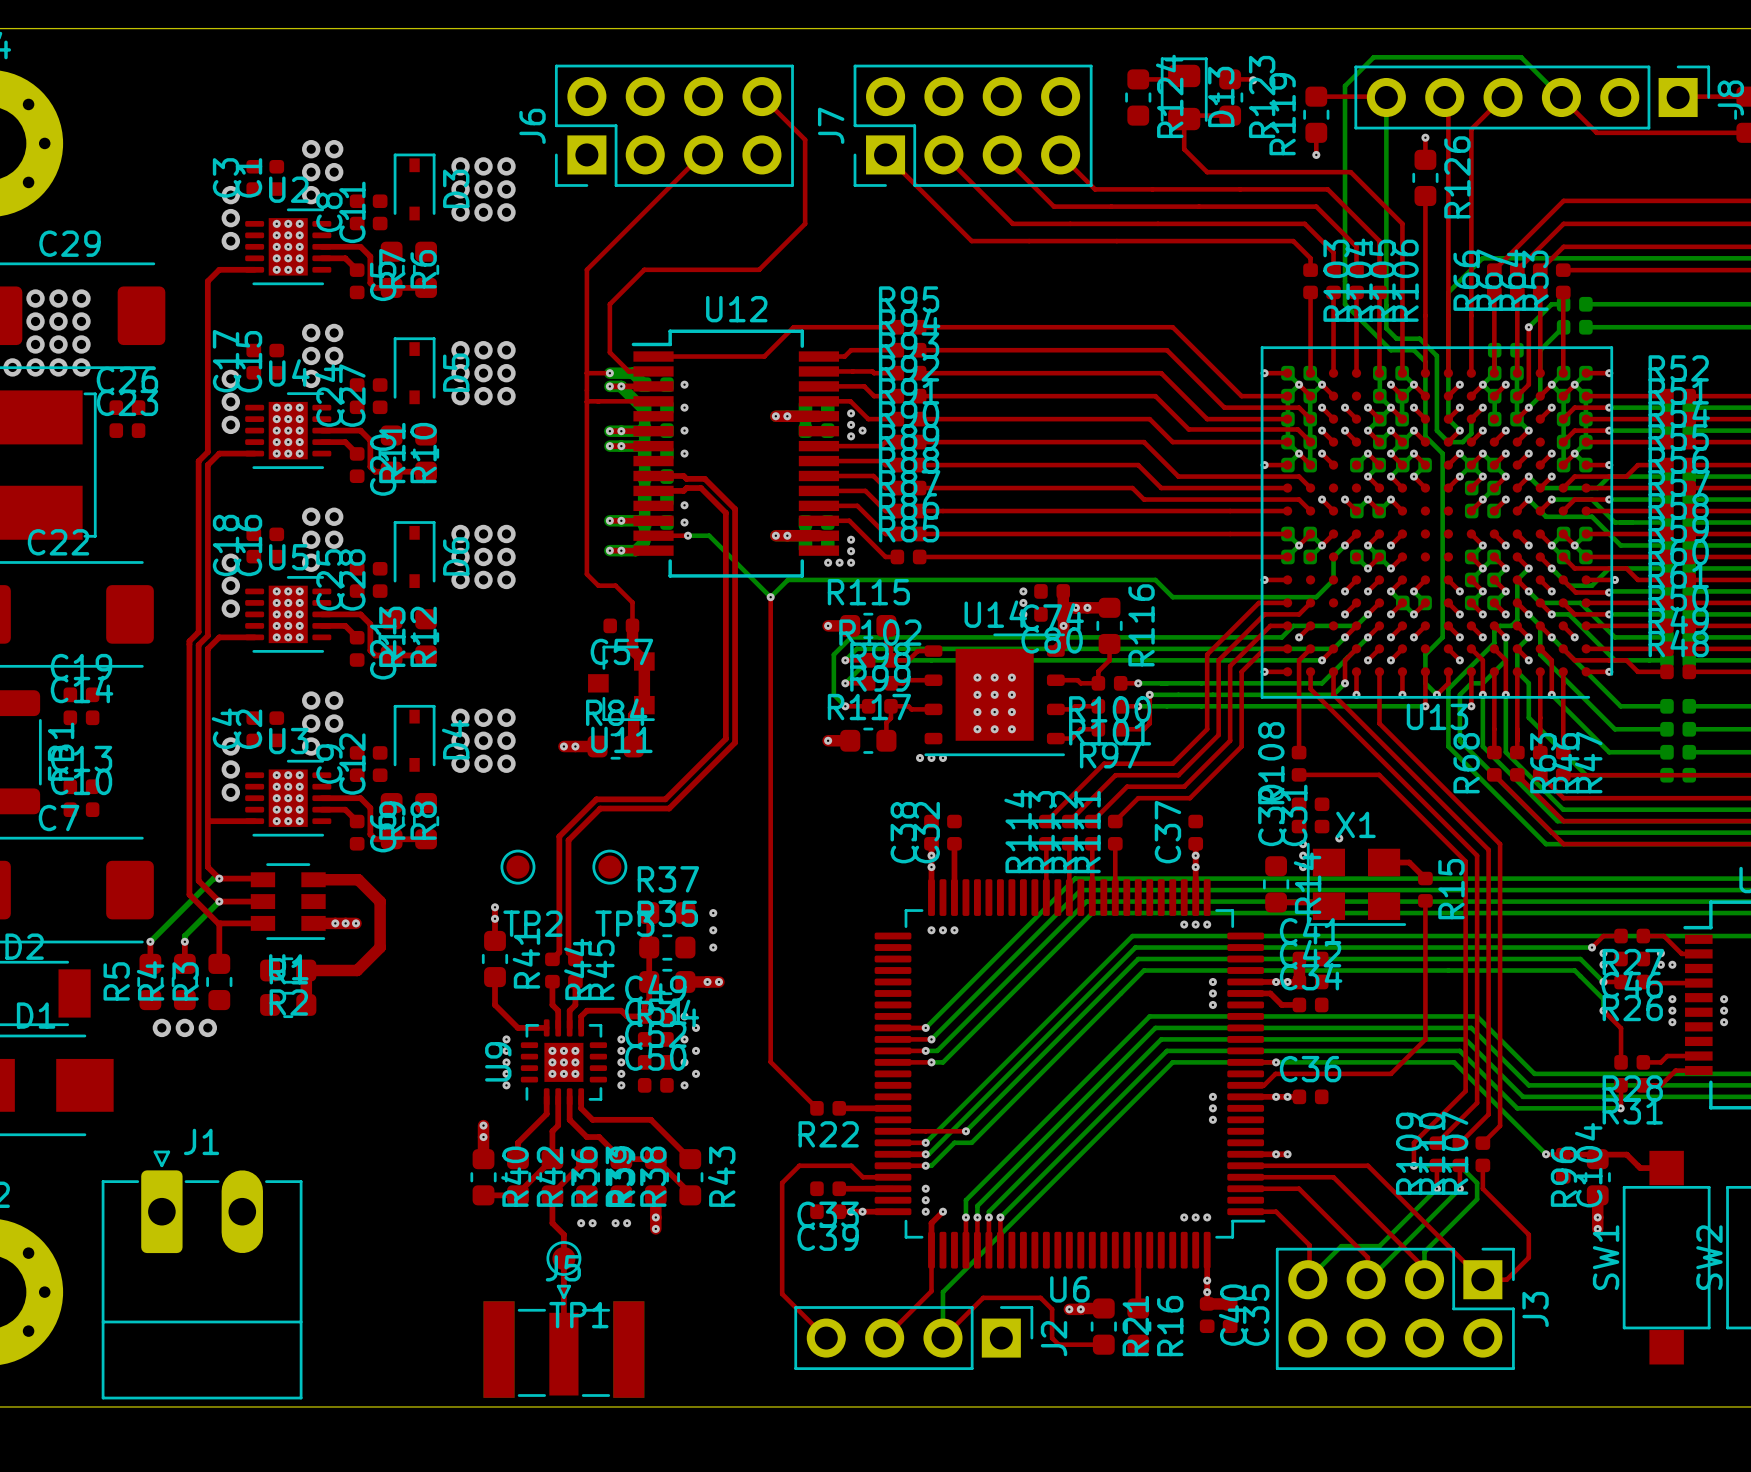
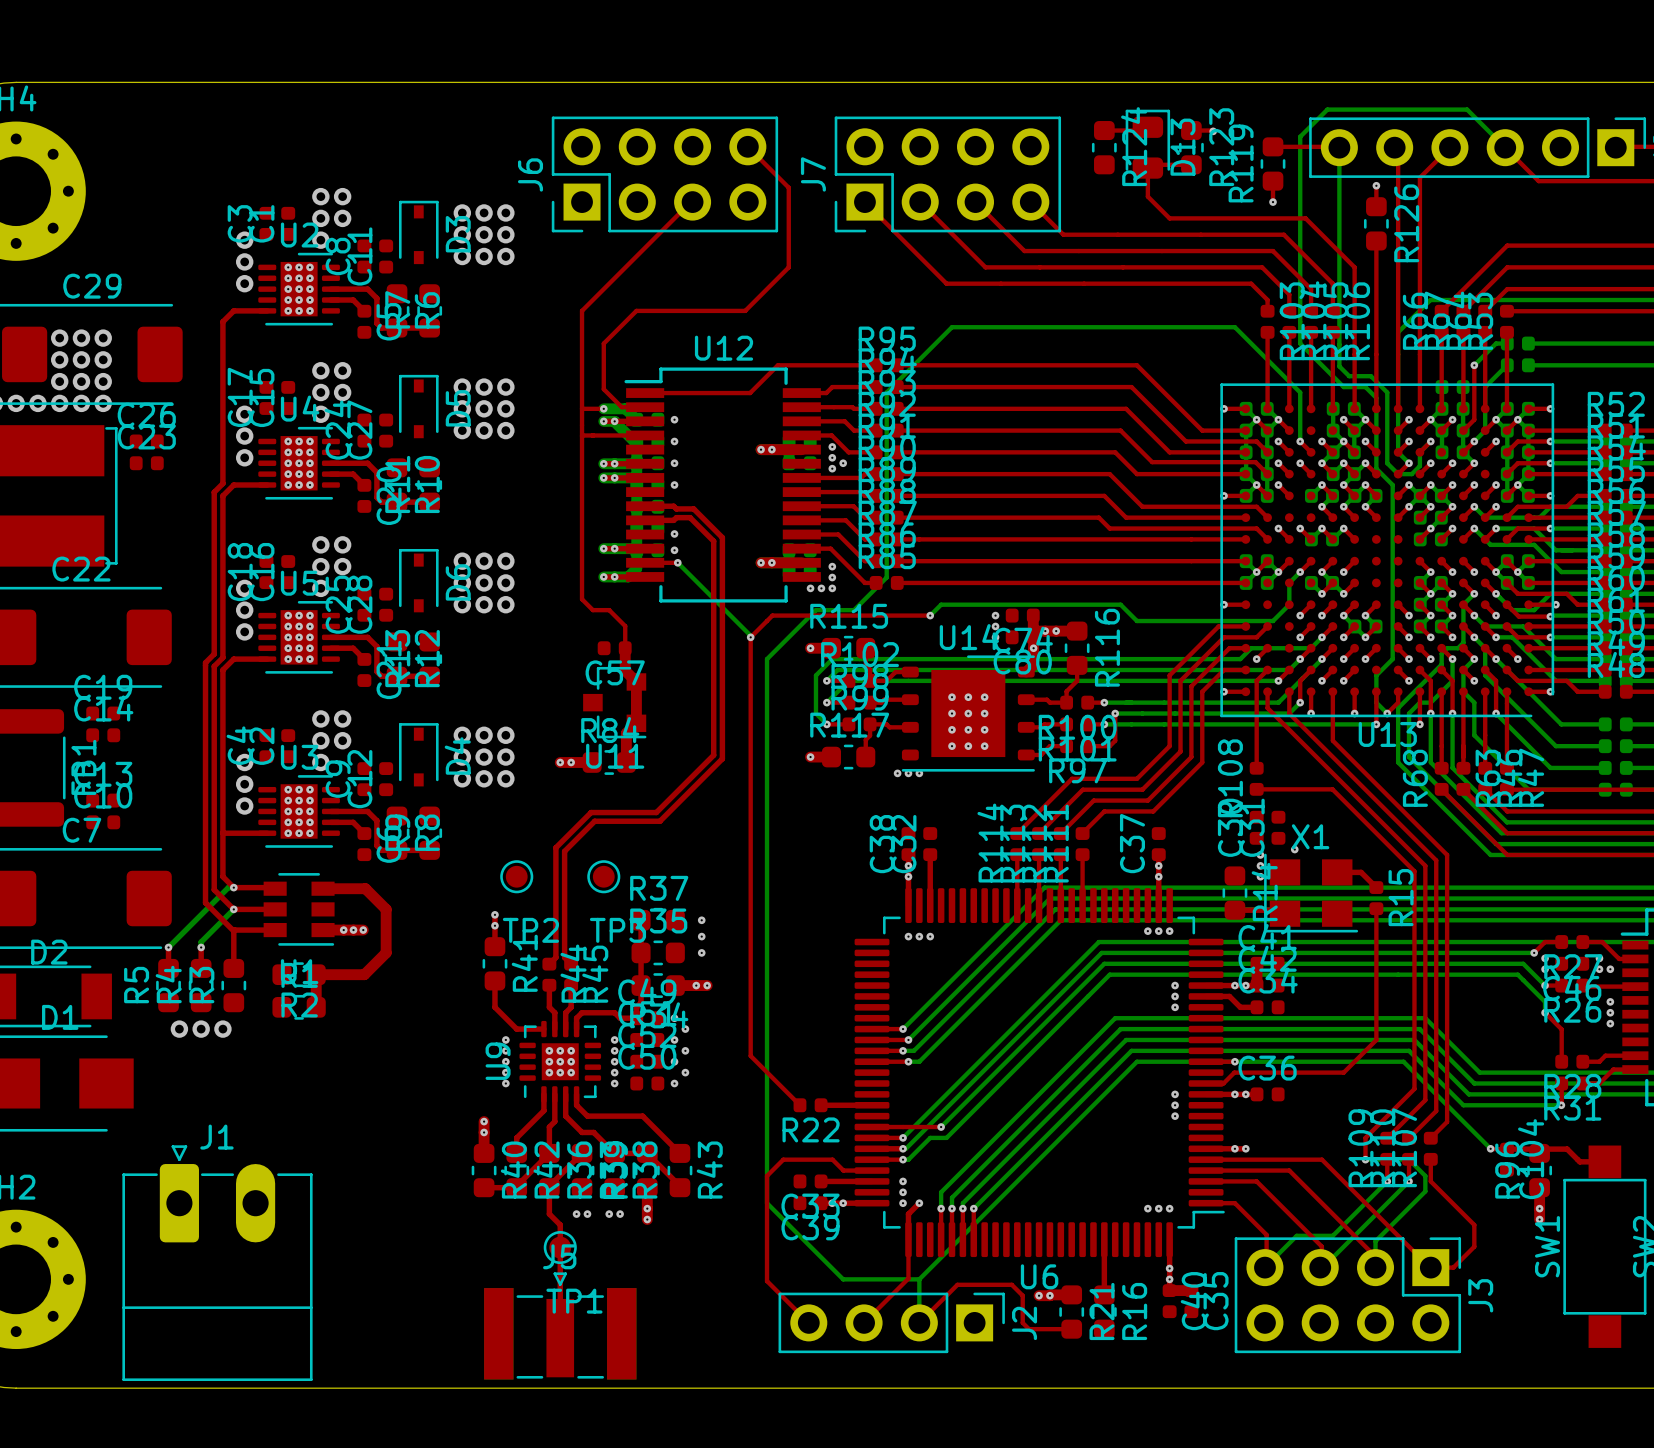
bottom track: none -> (1300, 441) (1300, 392) (1234, 327) (952, 327) (886, 392) (886, 577) (854, 610) (815, 610) (767, 659) (767, 1203) (843, 1279) (919, 1279)
bottom track: (687, 535) (709, 535) (770, 597) (787, 579) (965, 579) -> (677, 562) (750, 637)
bottom track: none -> (941, 604) (930, 615)
via: none -> (930, 615)
top track: (770, 597) (770, 1062) -> (930, 615) (772, 615) (750, 637) (750, 1055) (756, 1061)
via position: (770, 597) -> (750, 637)

